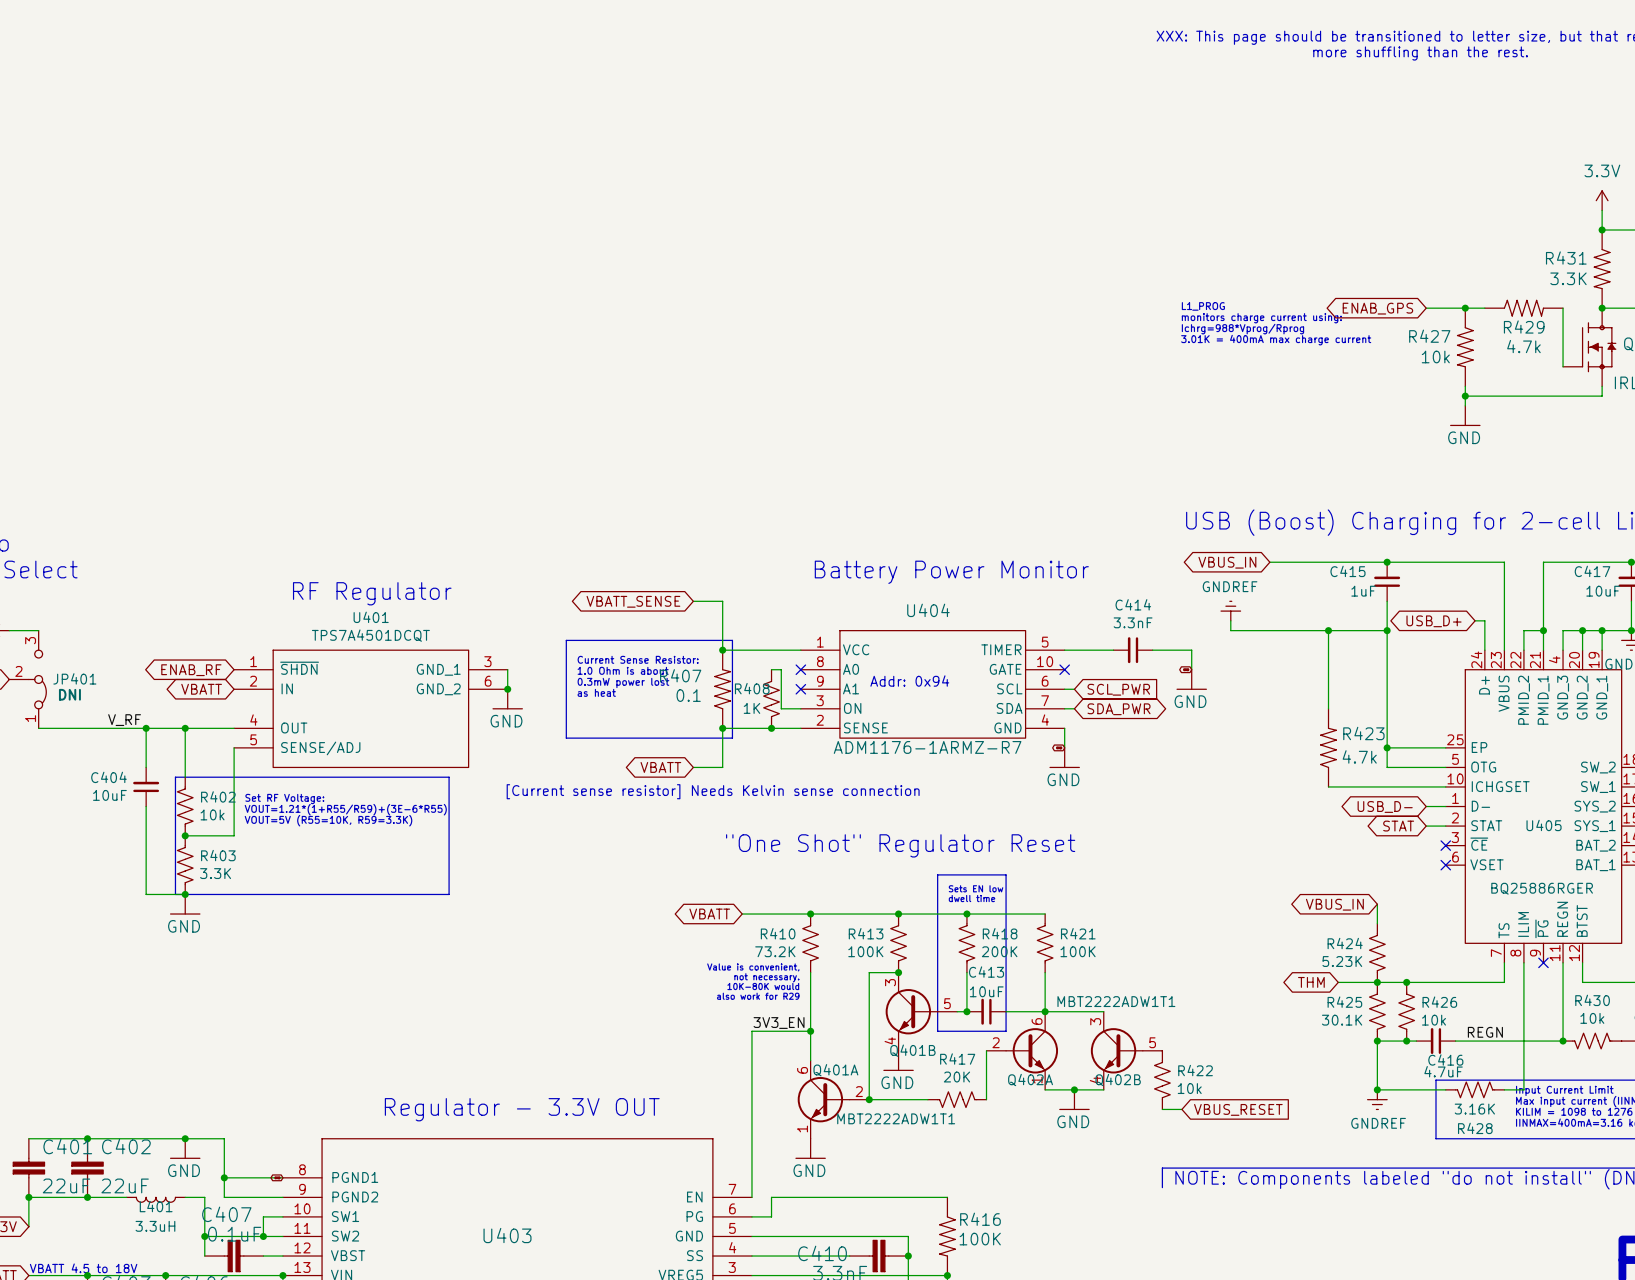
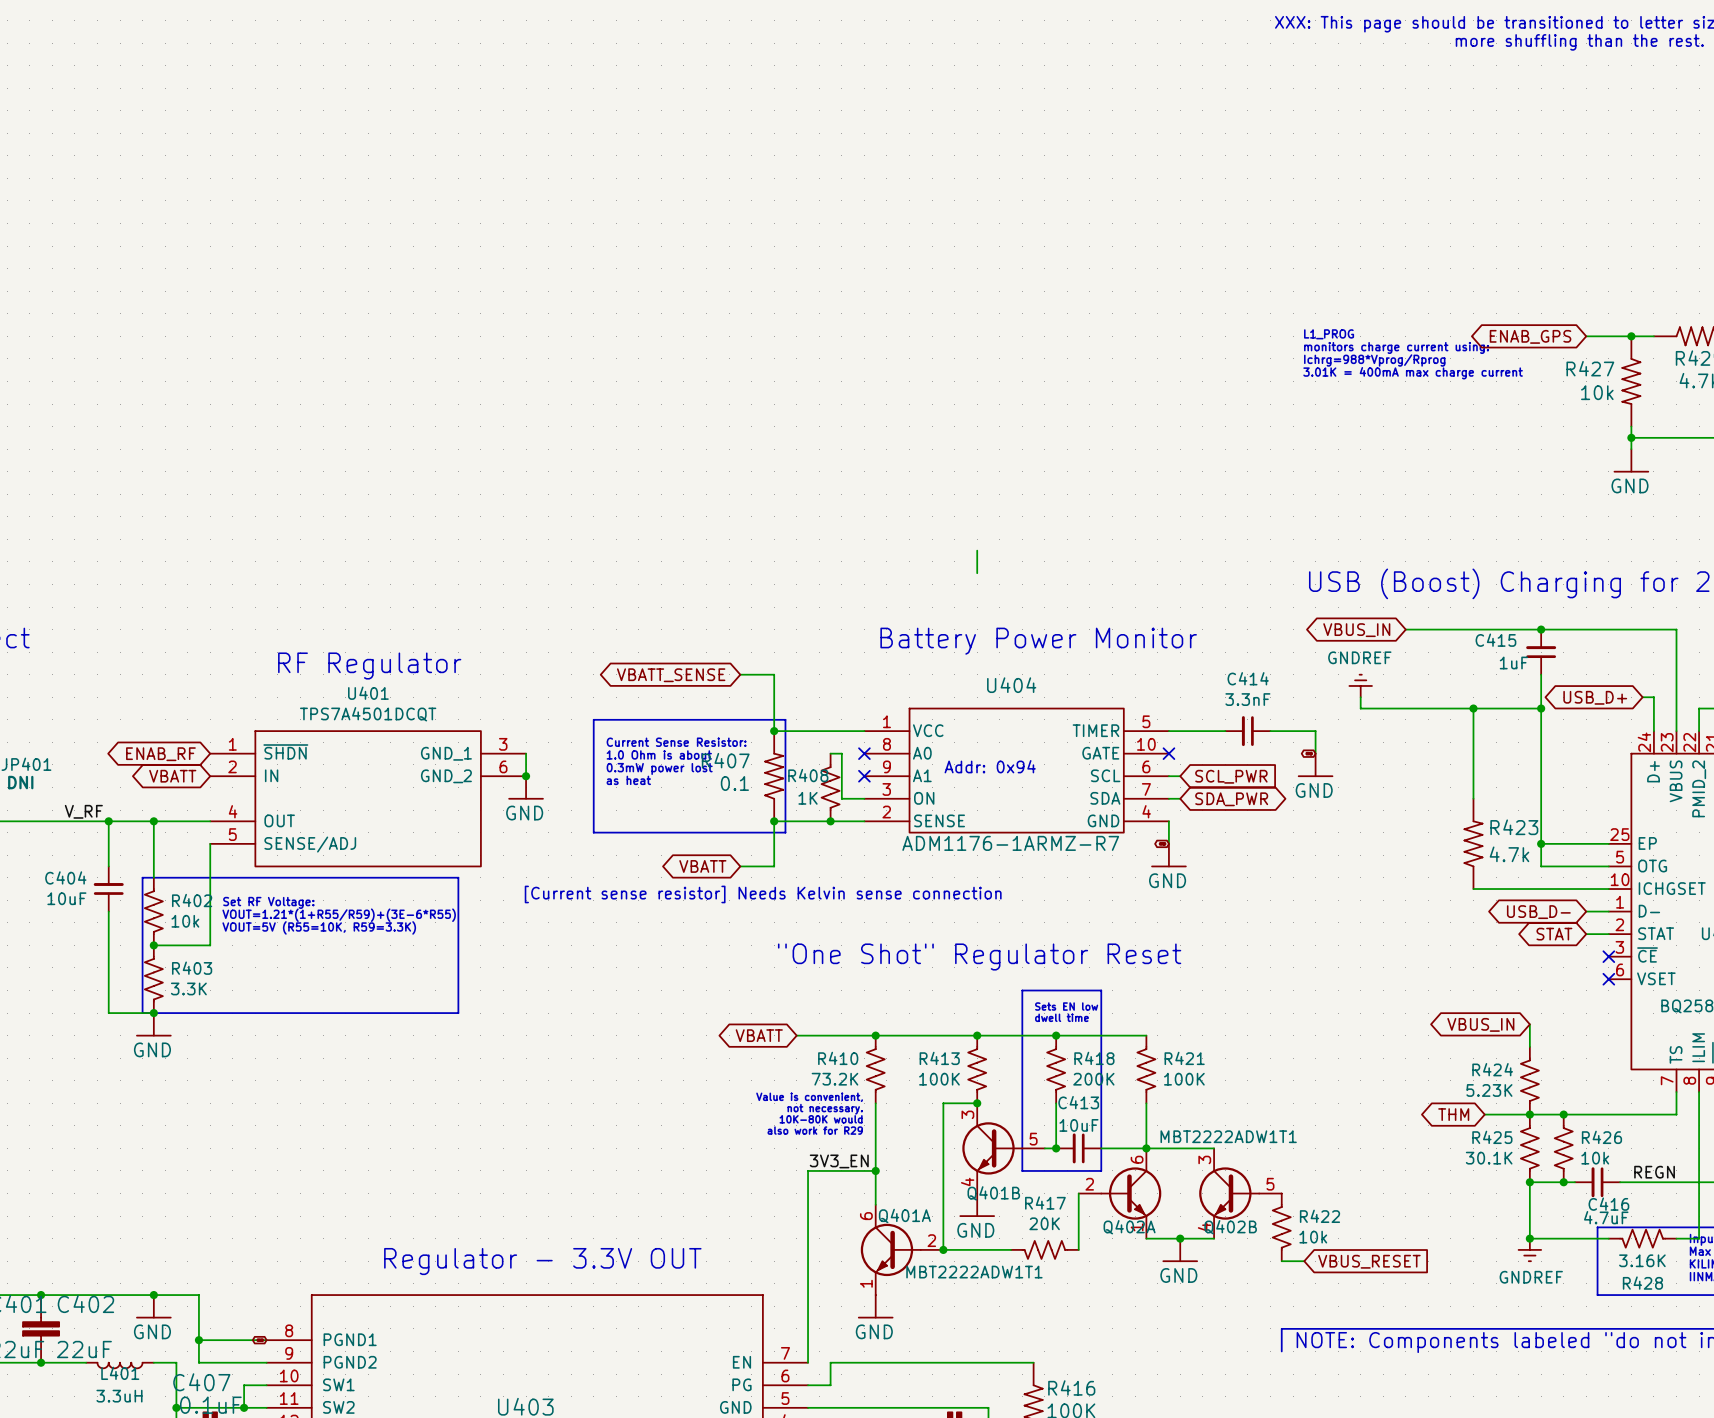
wire: none -> (977, 550) (977, 573)

